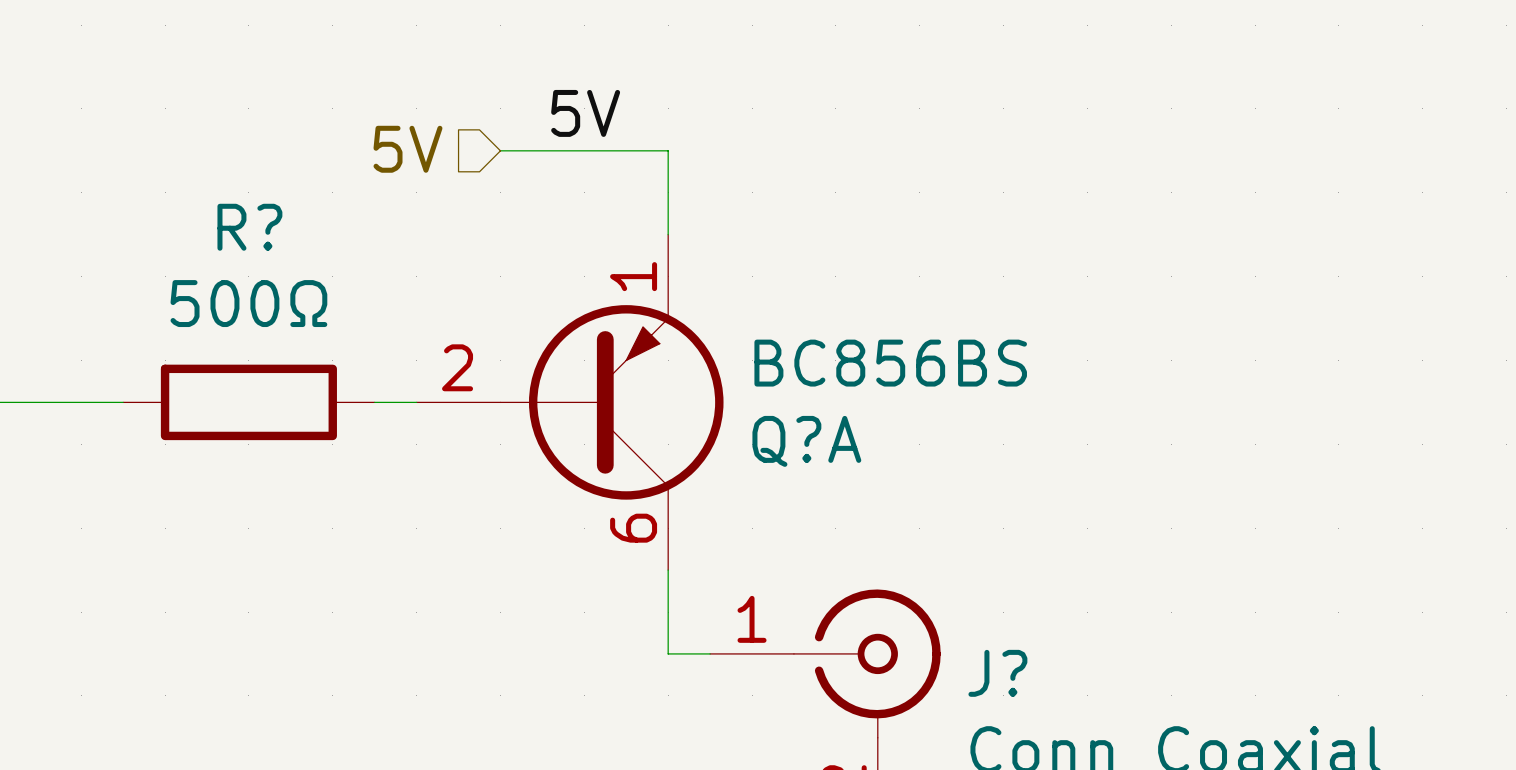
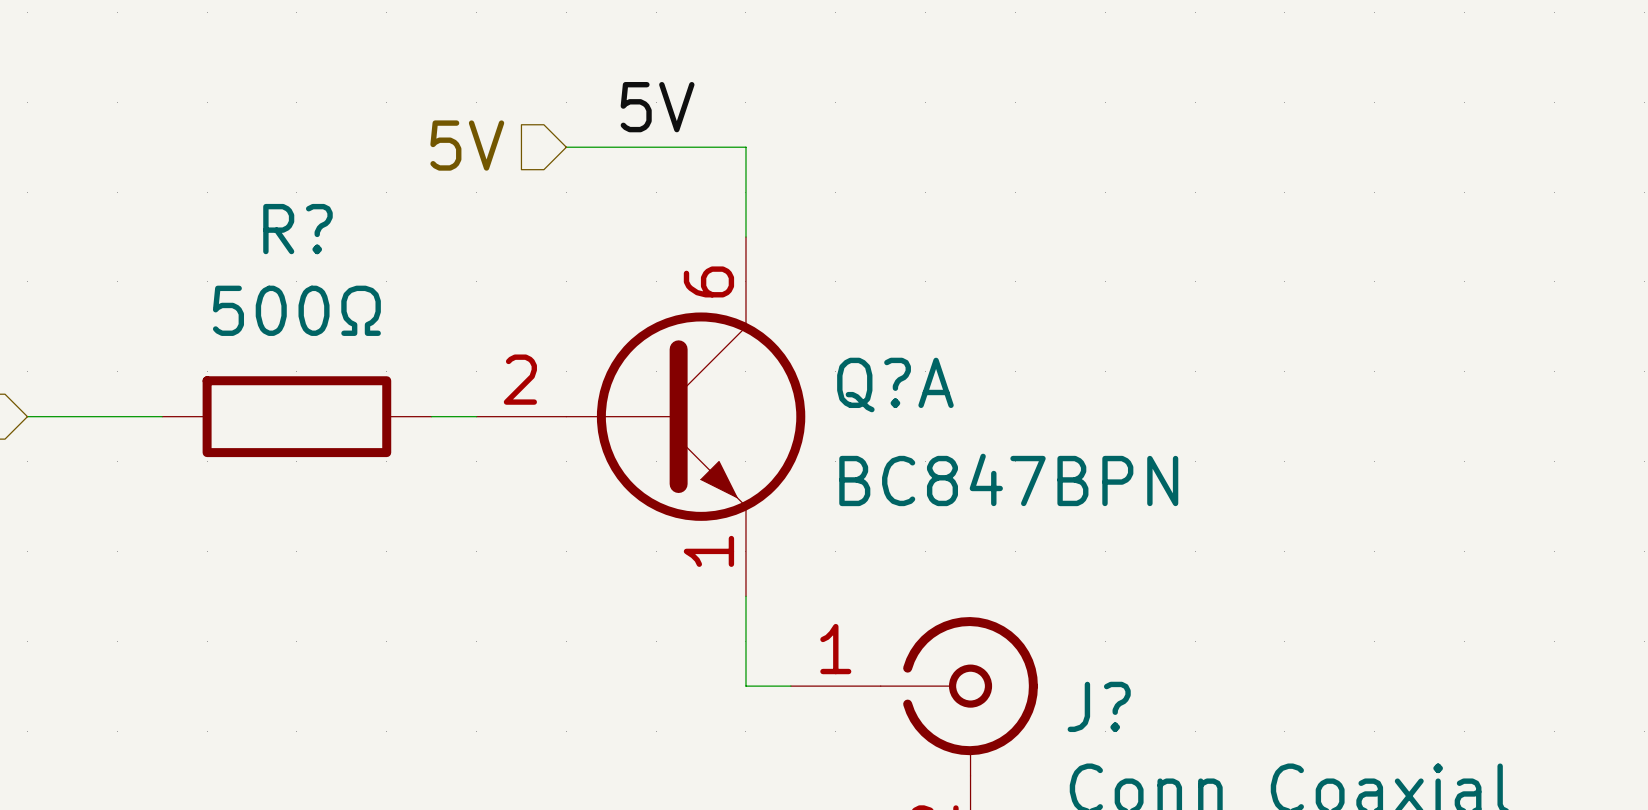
Q?A symbol: [416, 234, 724, 571] -> [476, 237, 806, 597]
Q?A value: BC856BS (890, 363) -> BC847BPN (1008, 479)
Q?A name position: Q?A (806, 441) -> Q?A (895, 385)

